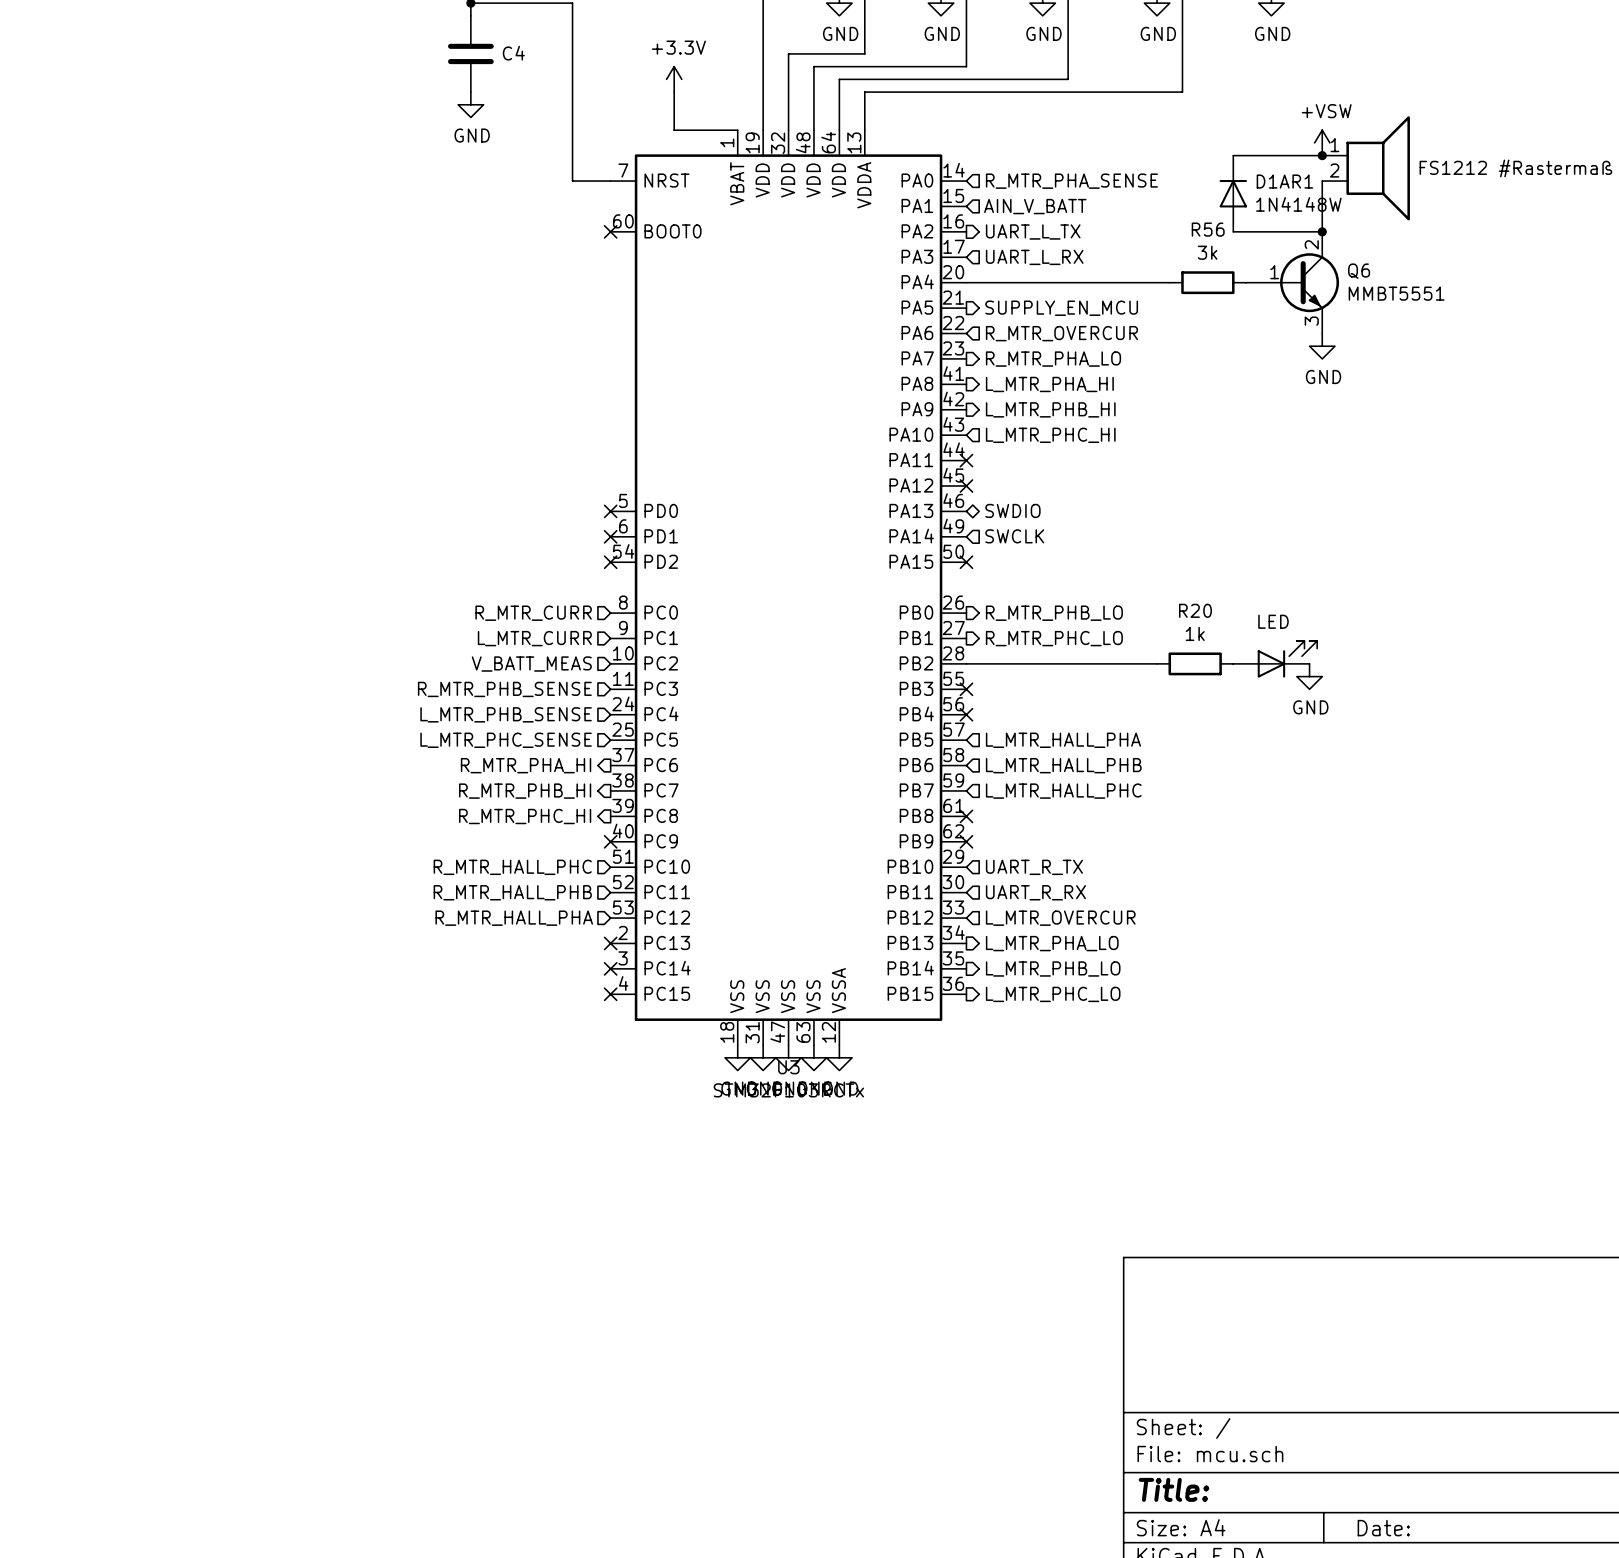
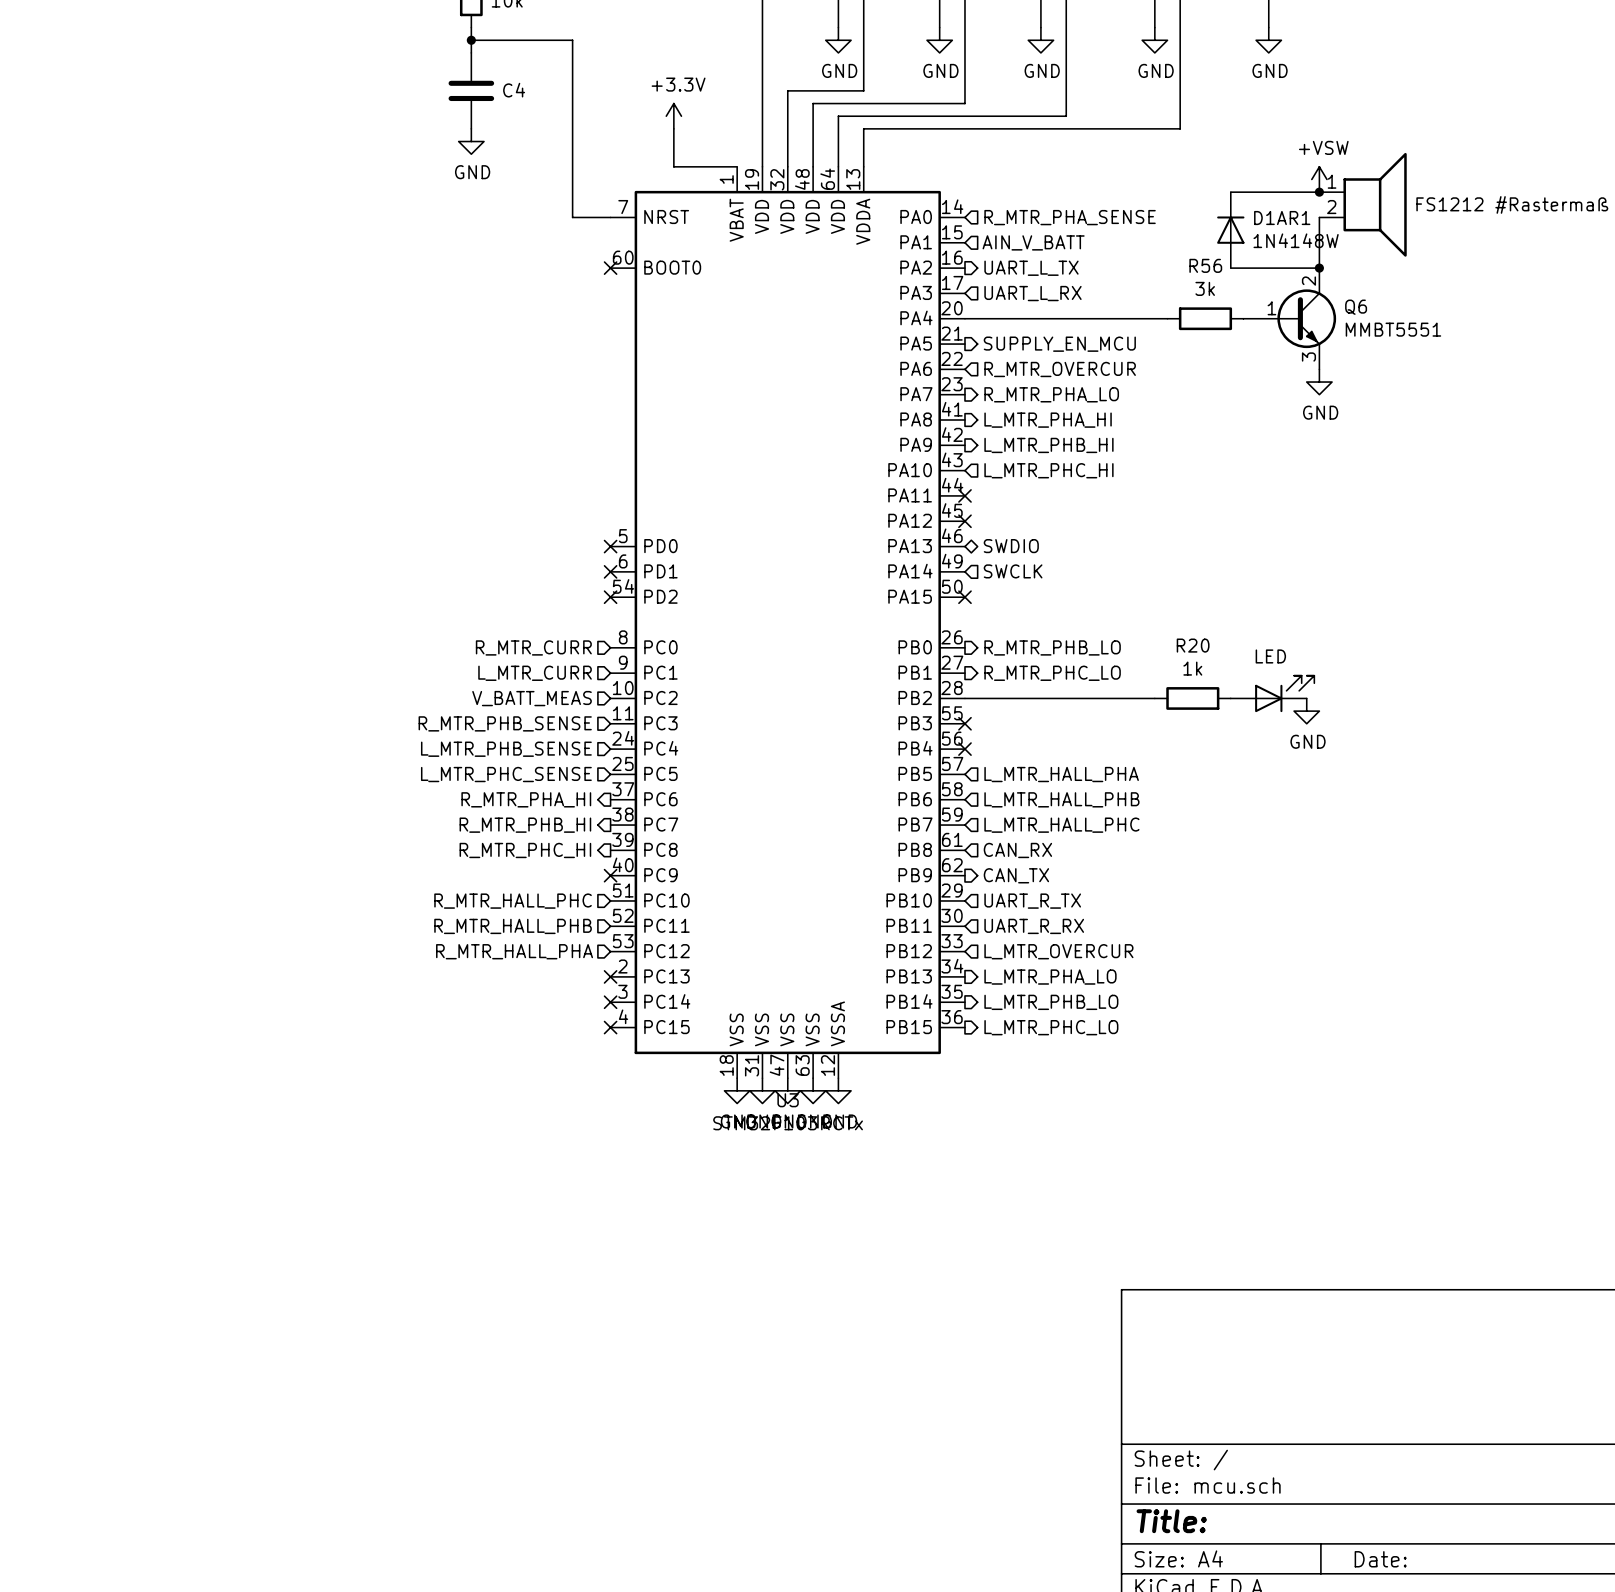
no-connect mark: (966, 816) -> none
hierarchical label: none -> CAN_RX (1017, 850)
no-connect mark: (966, 841) -> none
hierarchical label: none -> CAN_TX (1016, 875)

